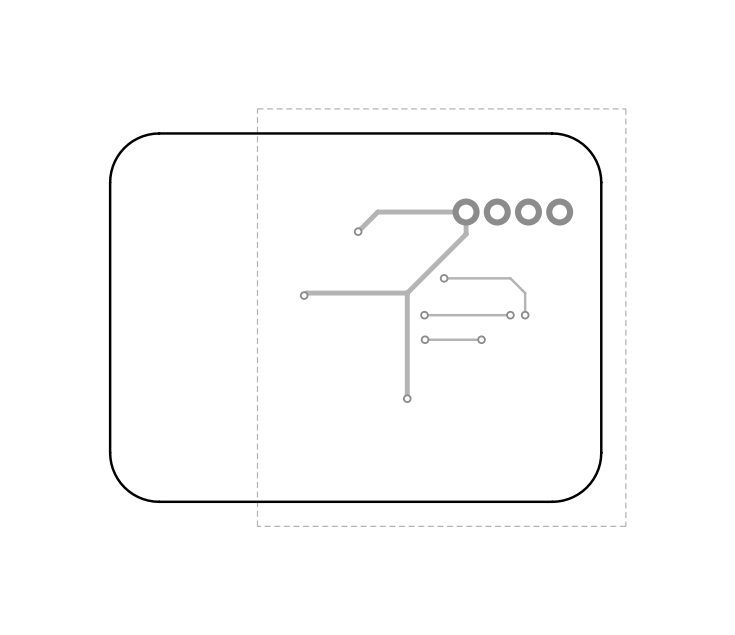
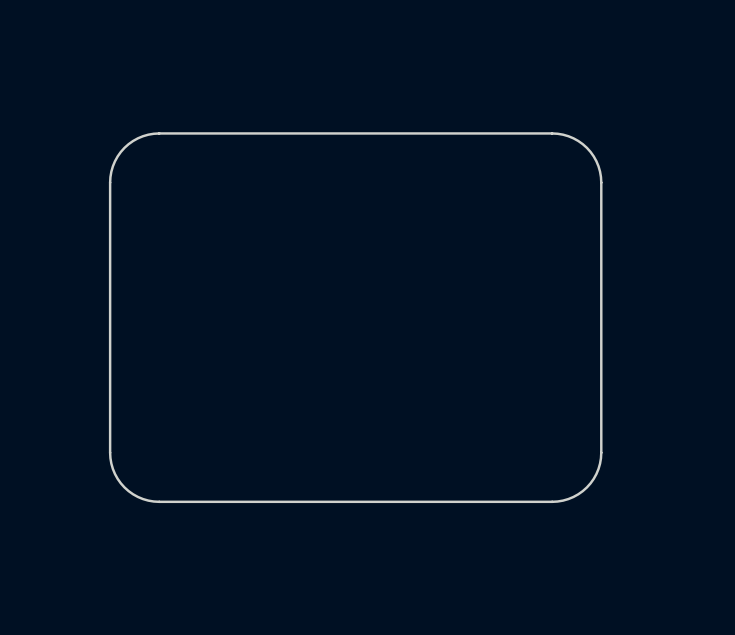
zone outline: (625, 108) (257, 108) (257, 526) (625, 526) (625, 108) -> none
part: (512, 212) -> none
track: (358, 231) (377, 212) (466, 212) (466, 234) (407, 293) -> none
via: (358, 231) -> none
track: (444, 278) (510, 278) (525, 293) (525, 315) -> none
via: (444, 278) -> none
track: (407, 293) (306, 293) (304, 295) -> none
track: (407, 293) (407, 398) -> none
via: (304, 295) -> none
via: (424, 315) -> none
track: (510, 315) (424, 315) -> none
via: (510, 315) -> none
via: (525, 315) -> none
via: (425, 339) -> none
track: (481, 339) (425, 339) -> none
via: (481, 339) -> none
via: (407, 398) -> none

